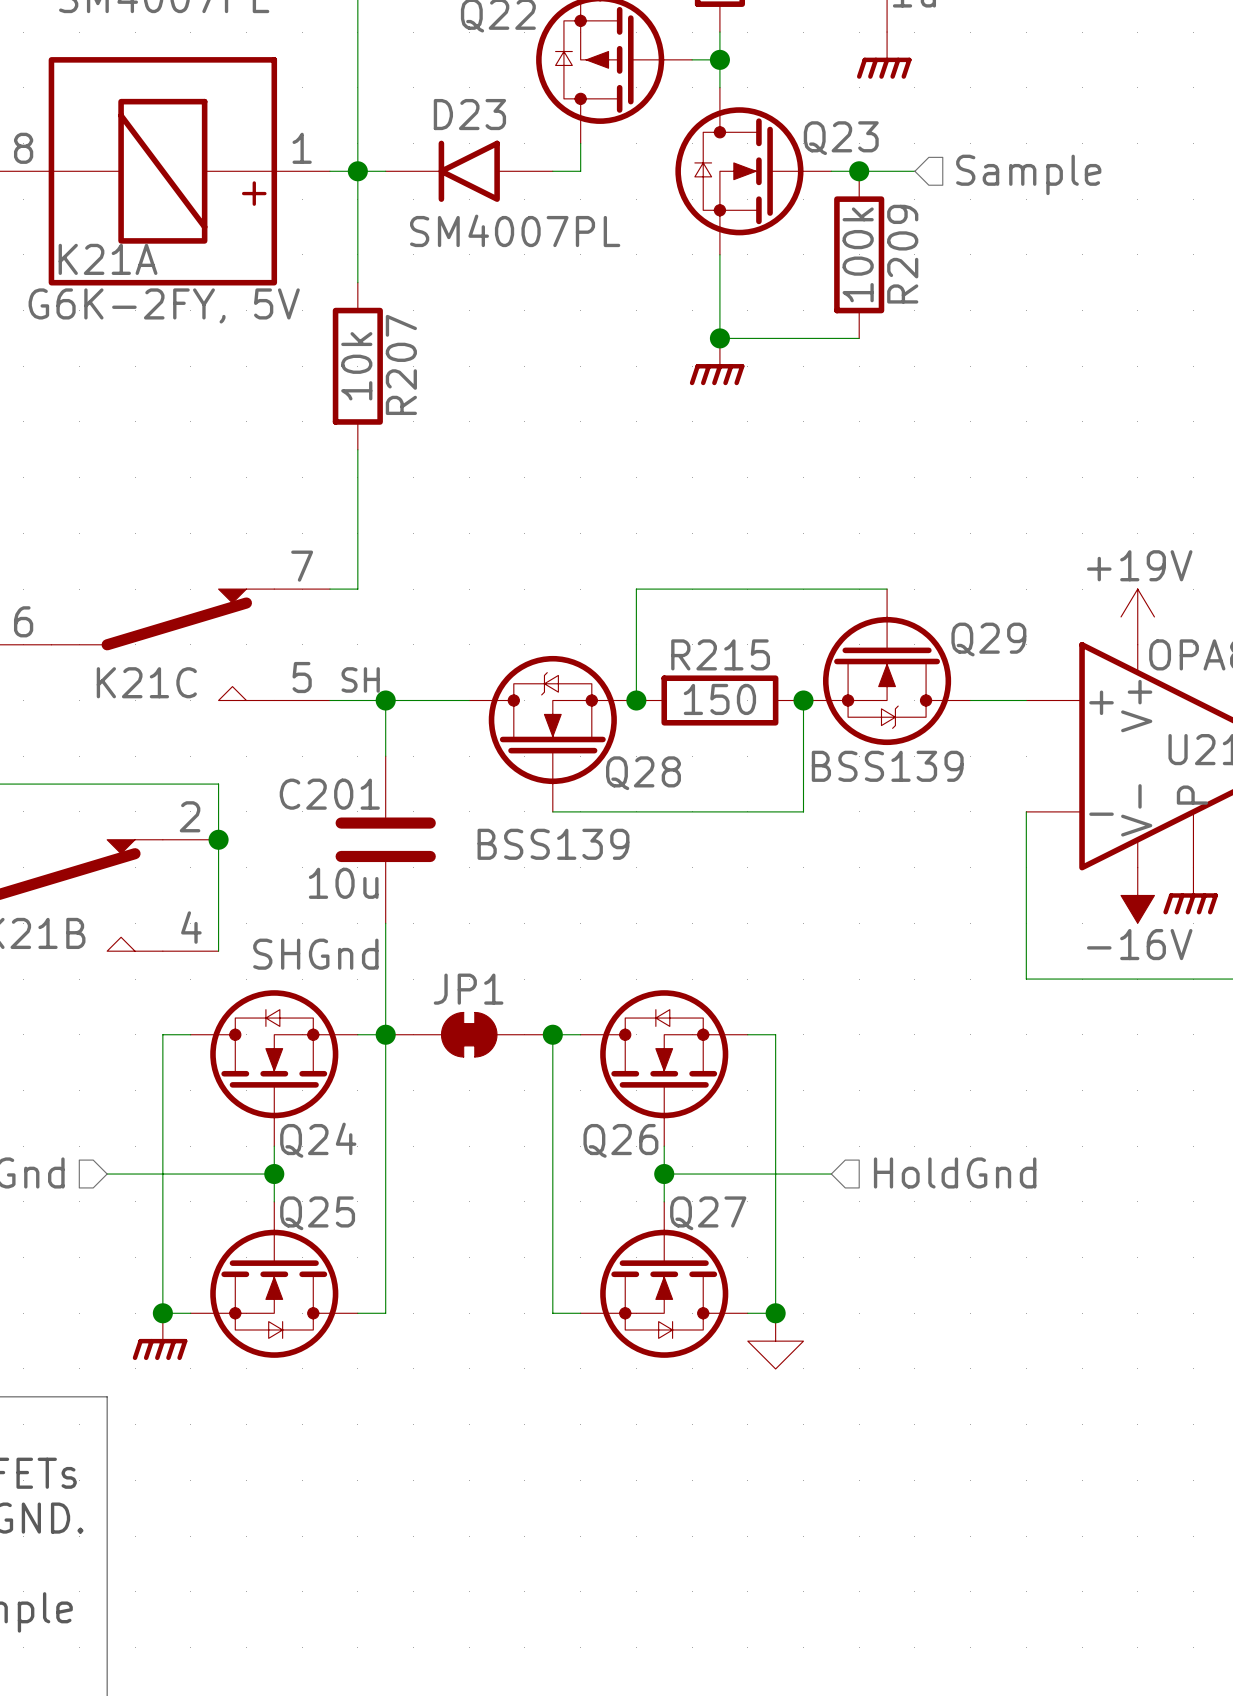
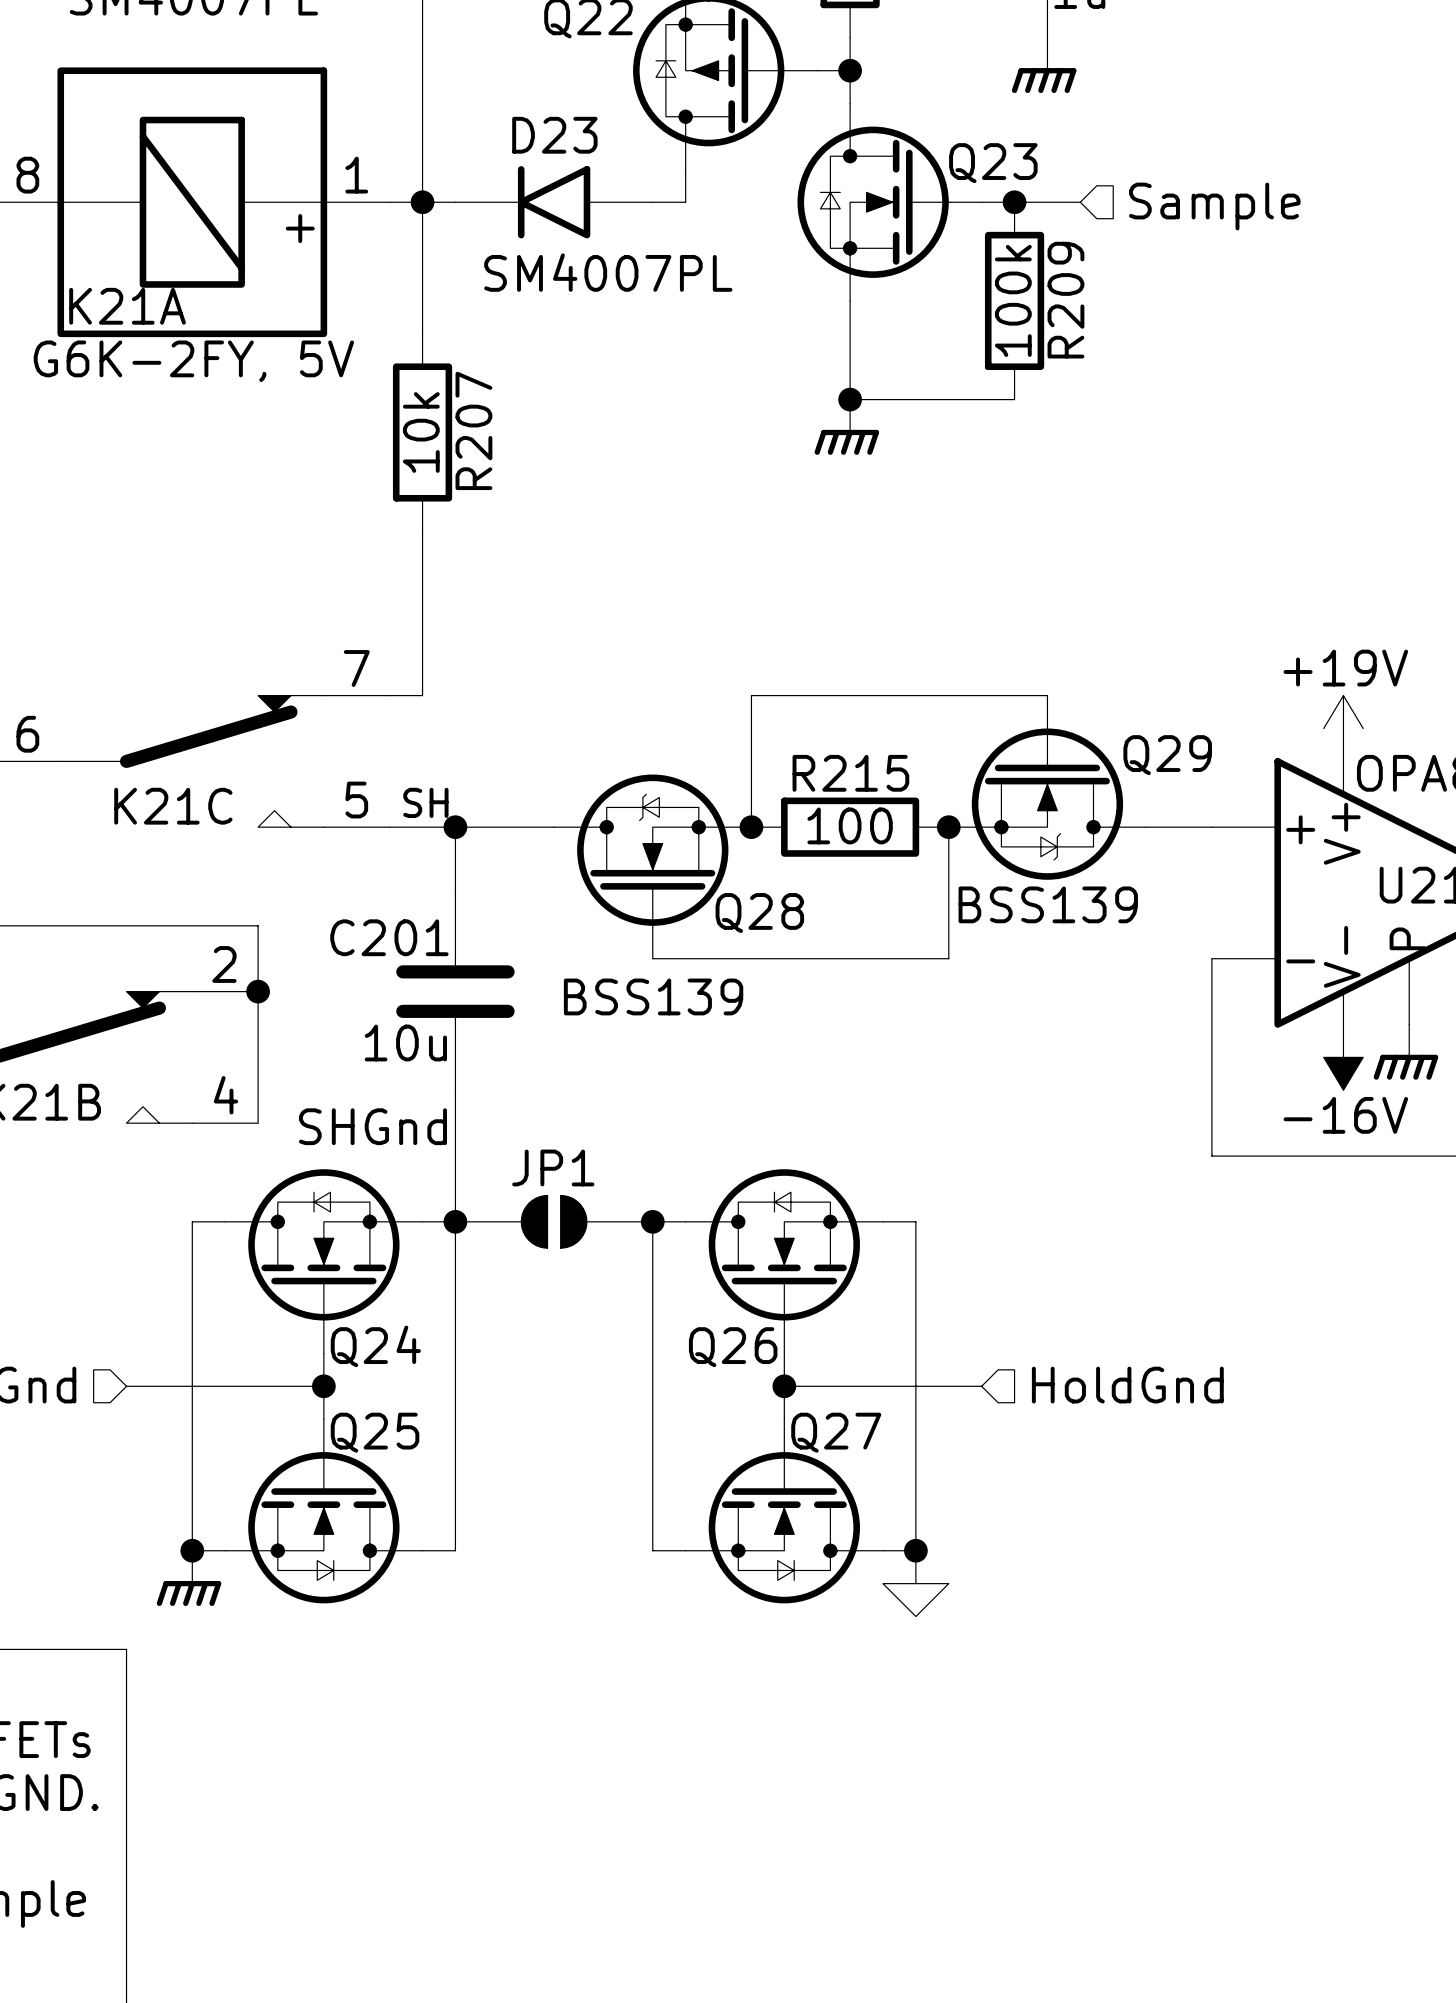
R215 value: 150 (719, 699) -> 100 (850, 825)
JP1 symbol: [385, 1012, 553, 1058] -> [455, 1195, 653, 1249]

